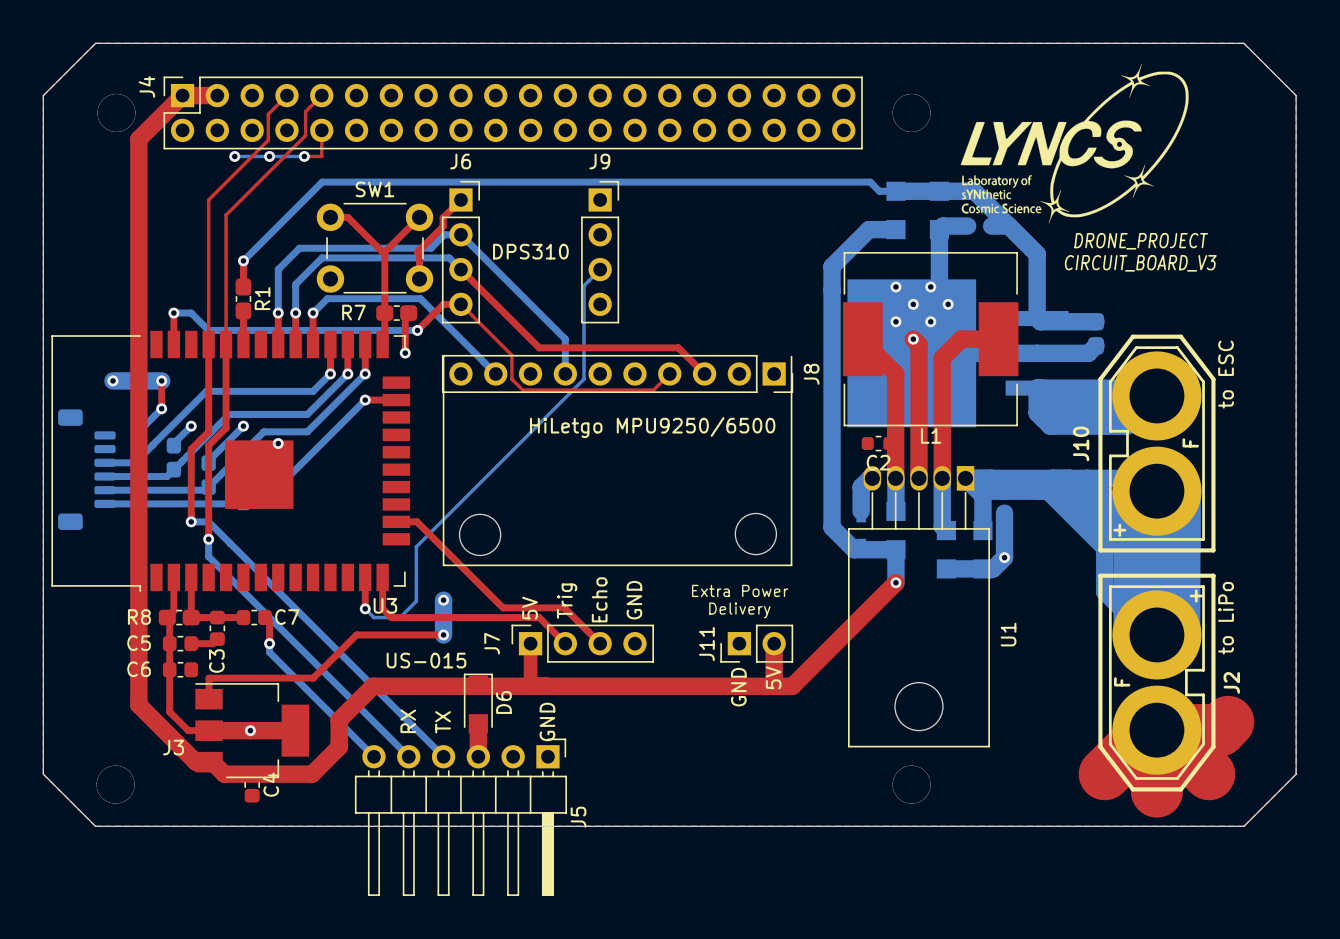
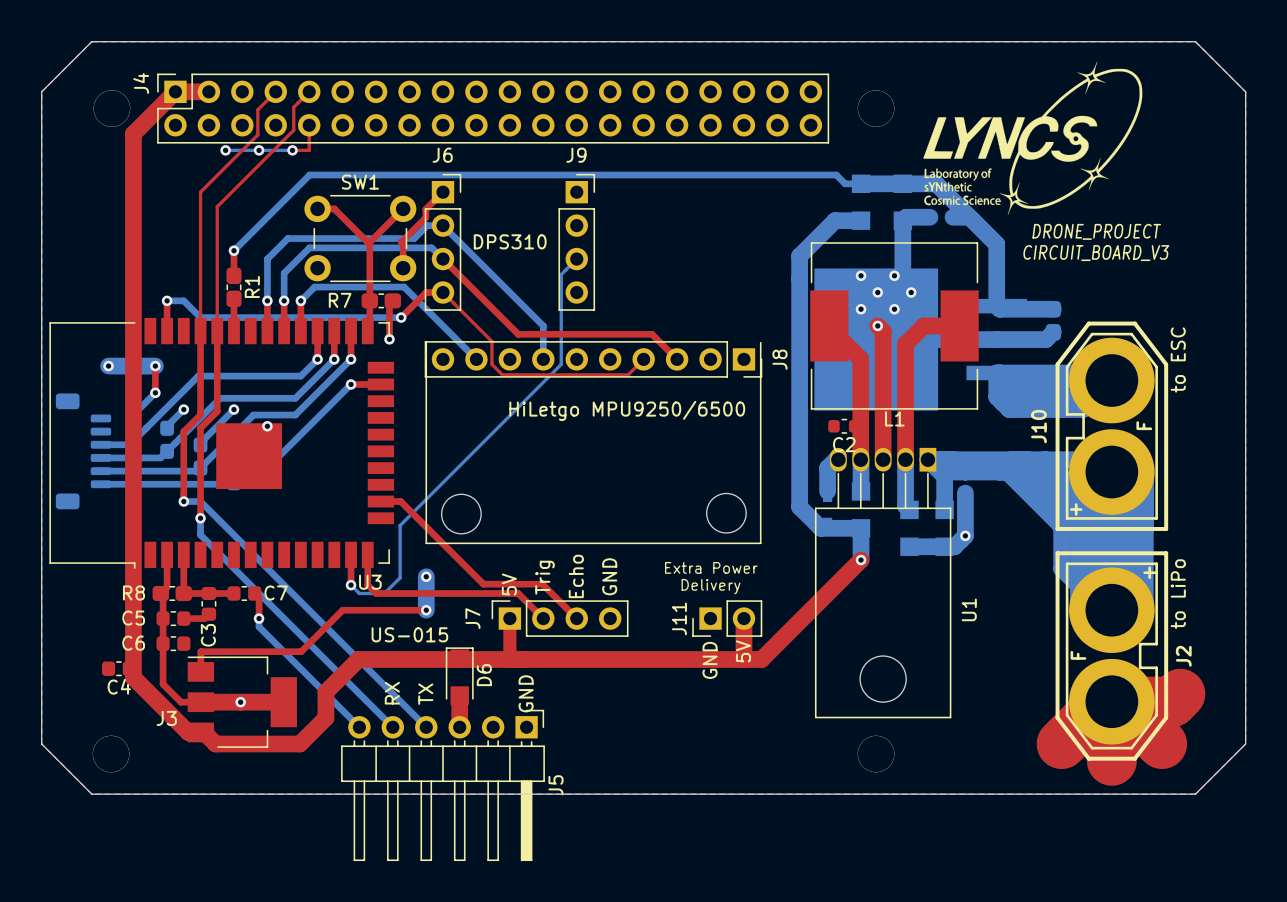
C4 rotation: 0° (252, 784) -> 90° clockwise (118, 668)
C4 position: (252, 784) -> (118, 668)

